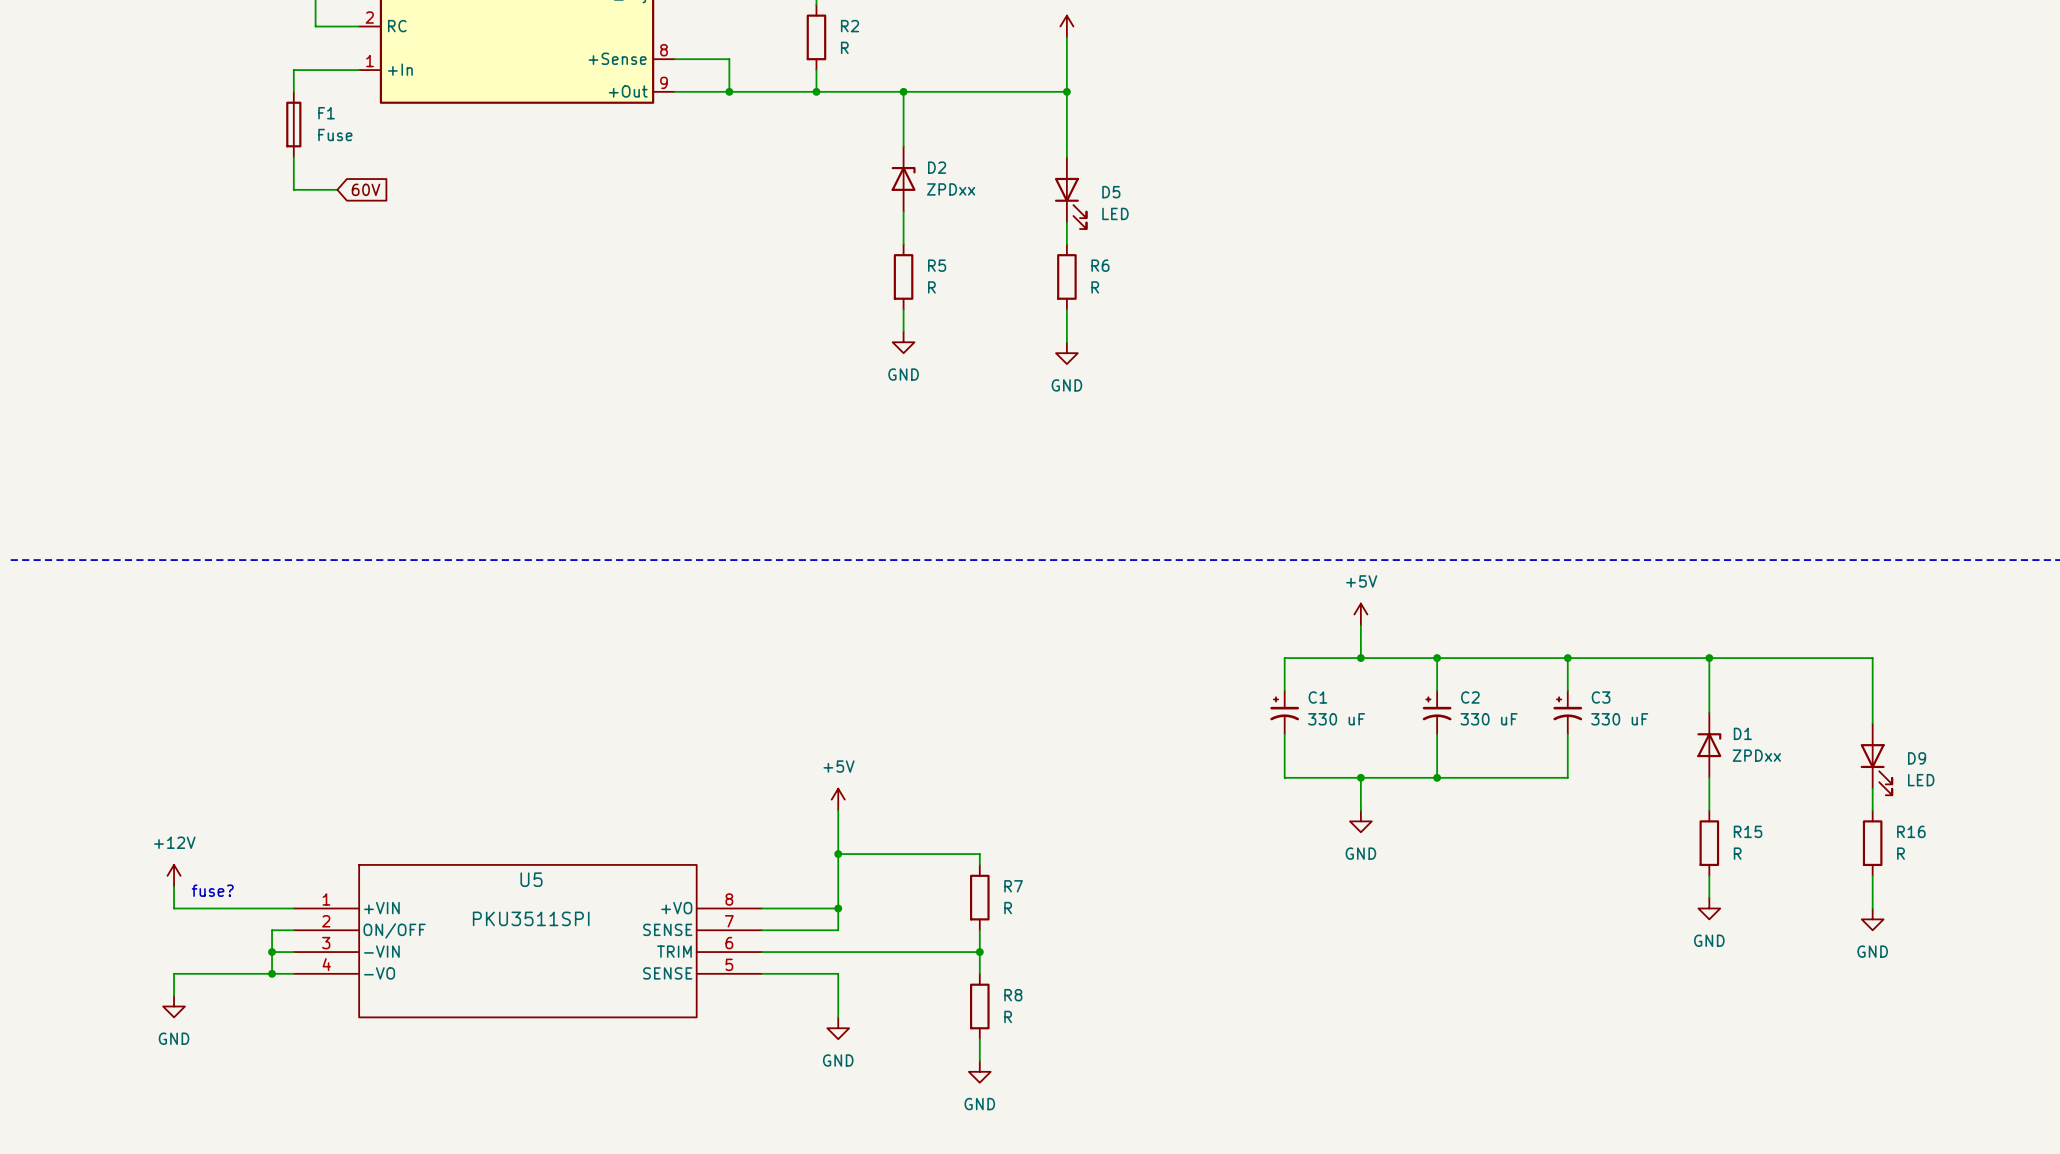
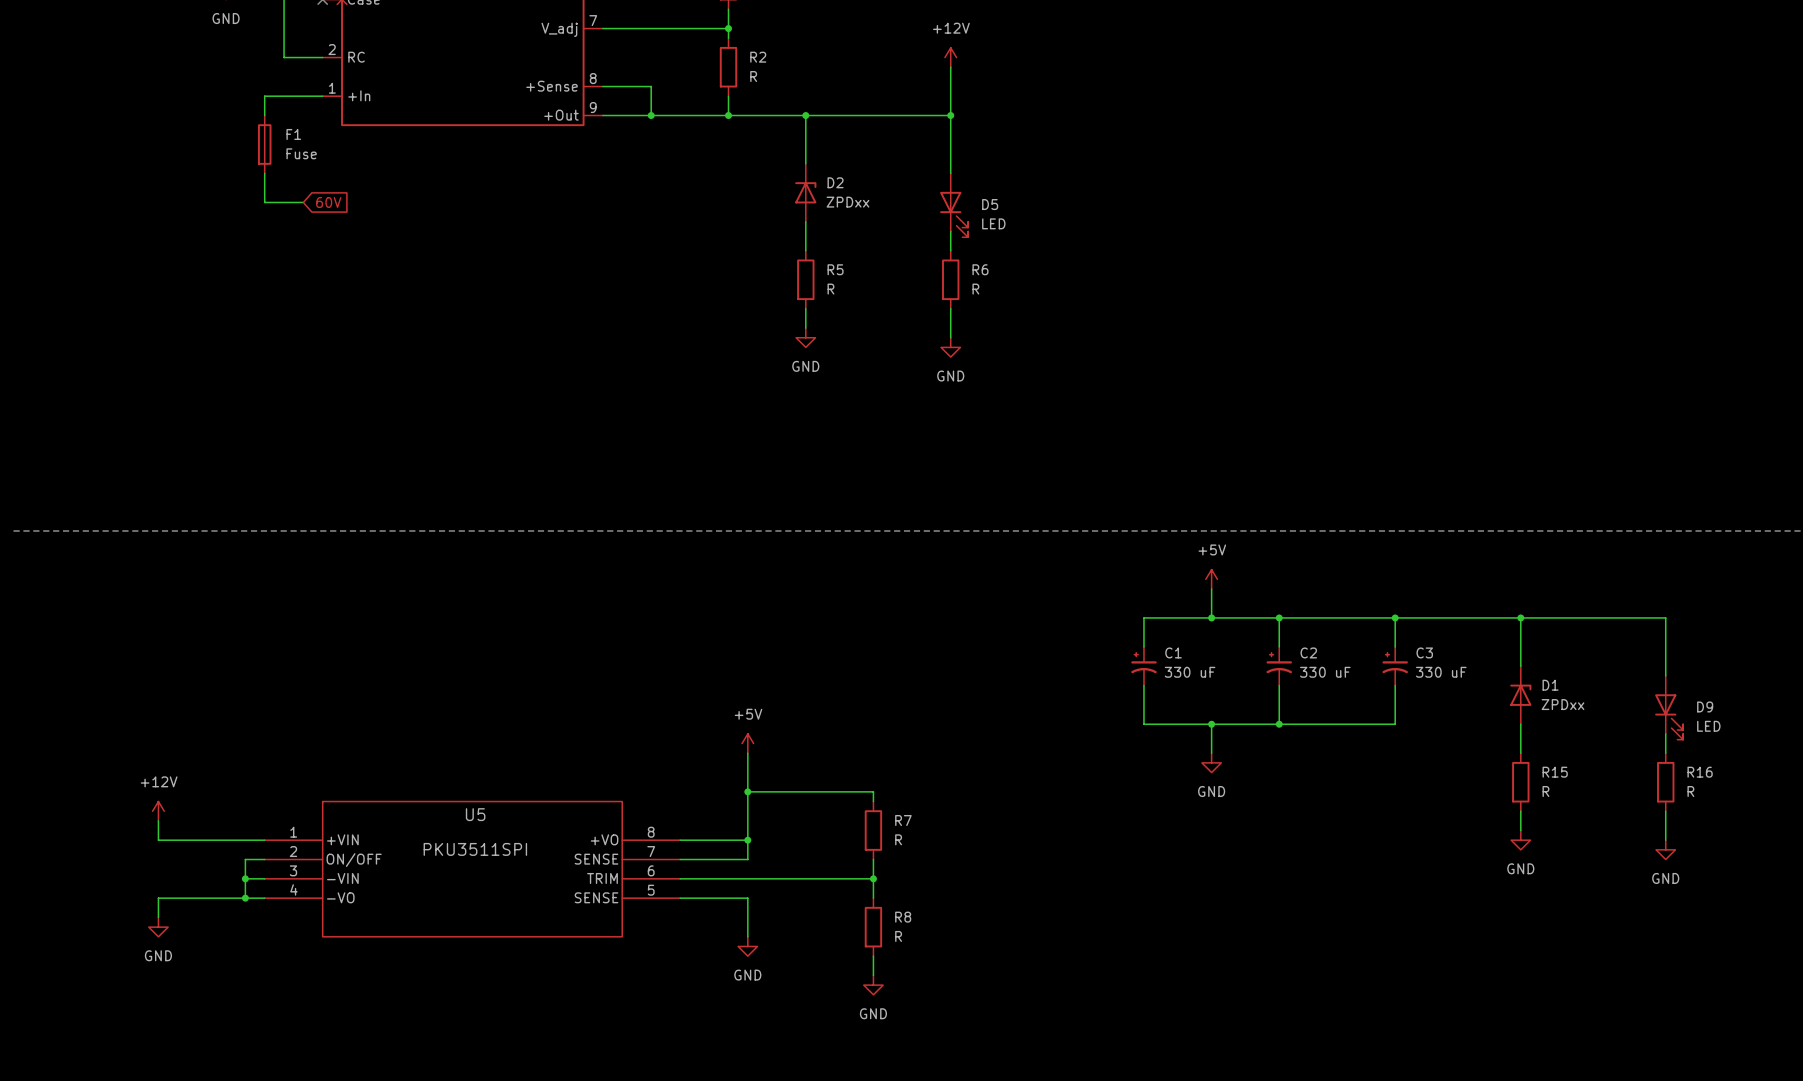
text: fuse? (212, 890) -> none

